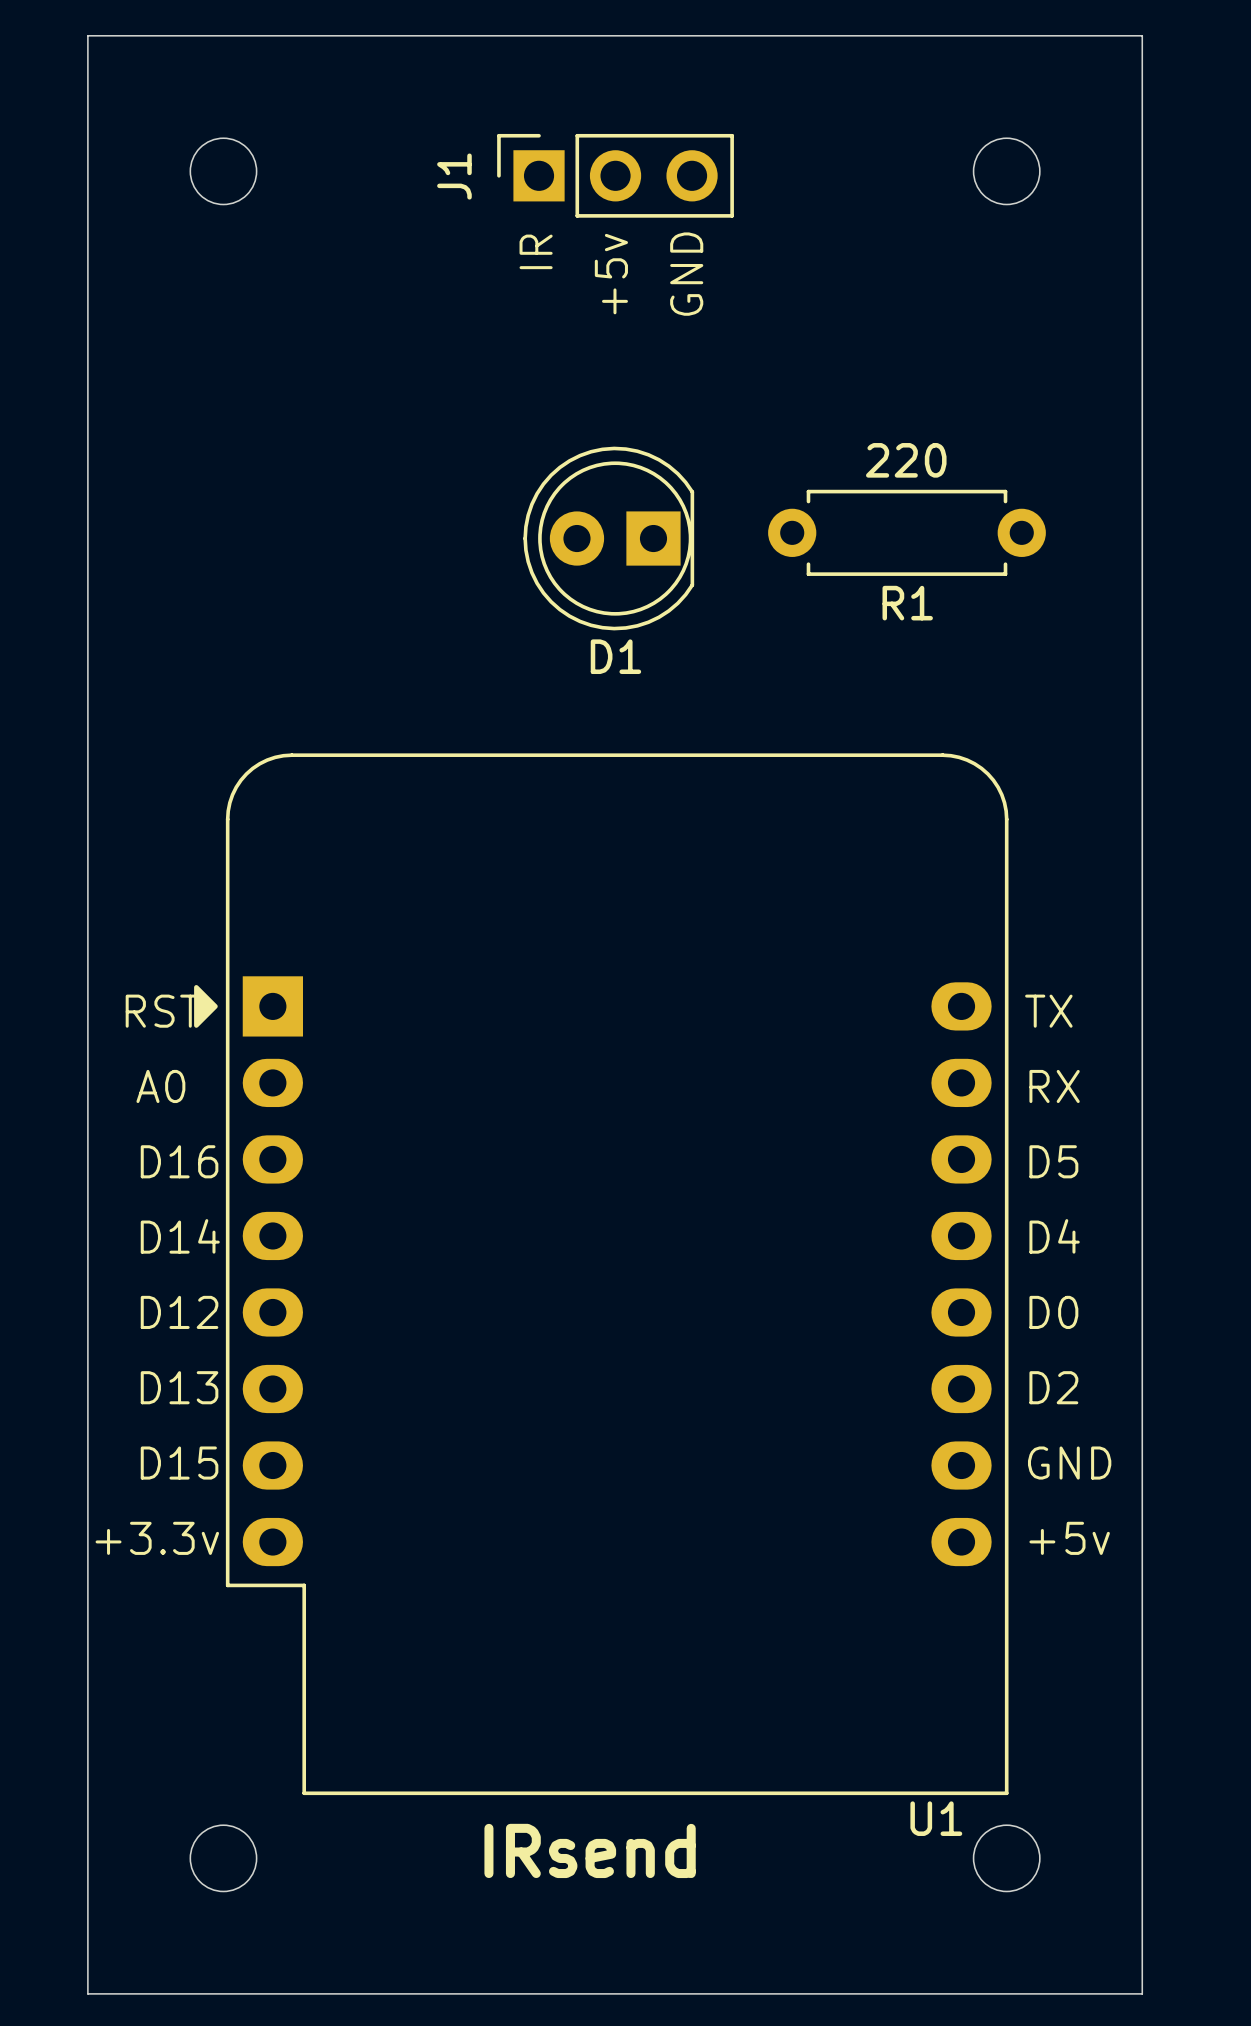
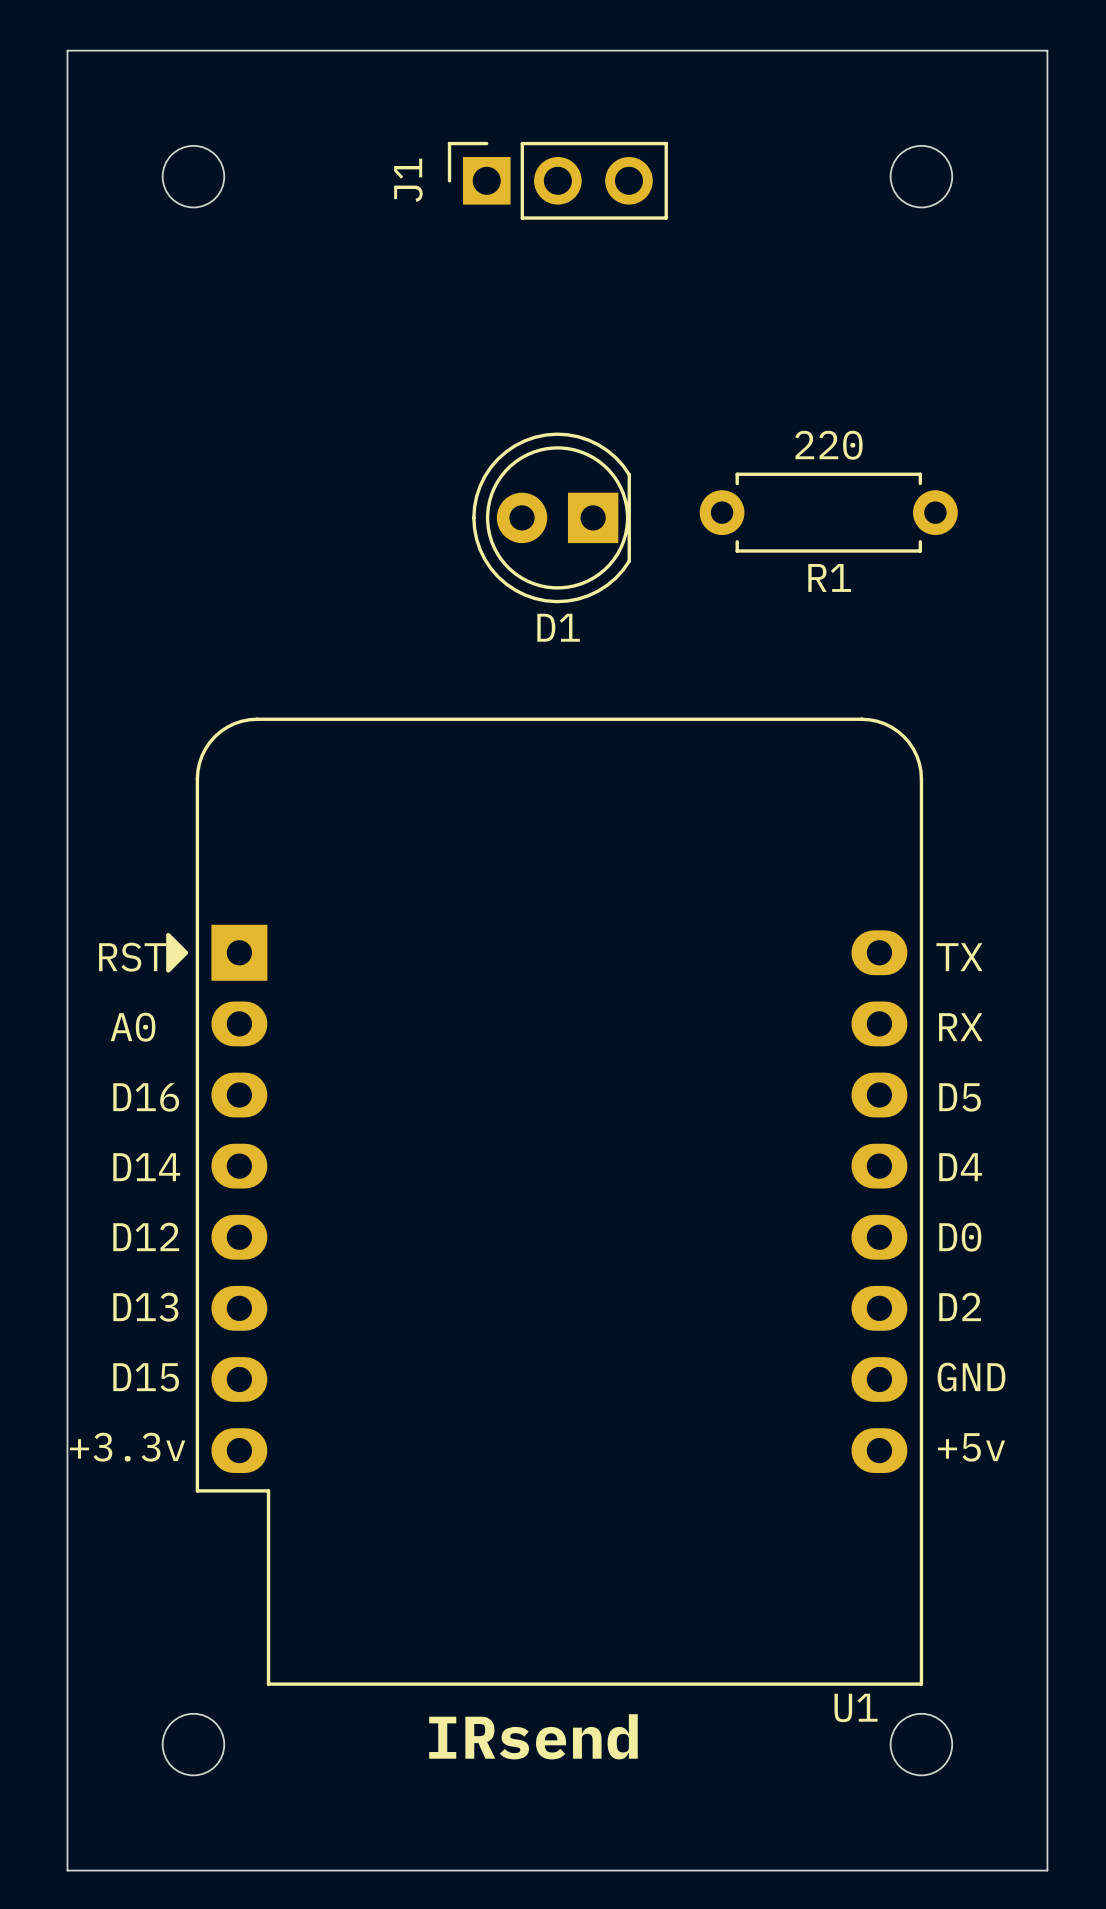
text: IR (536, 251) -> none
text: +5v (611, 274) -> none
text: GND (686, 274) -> none

